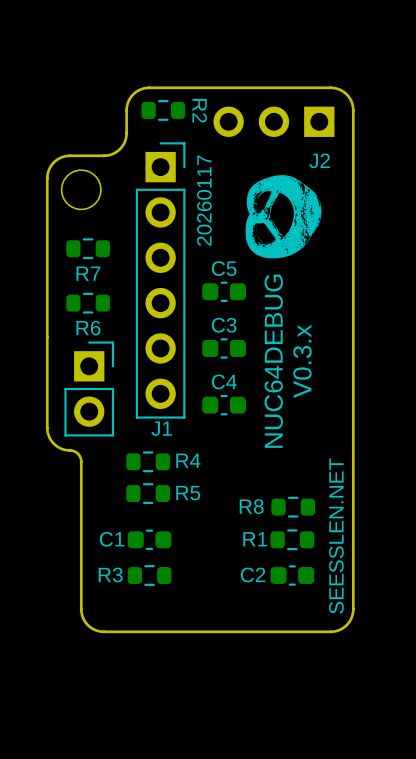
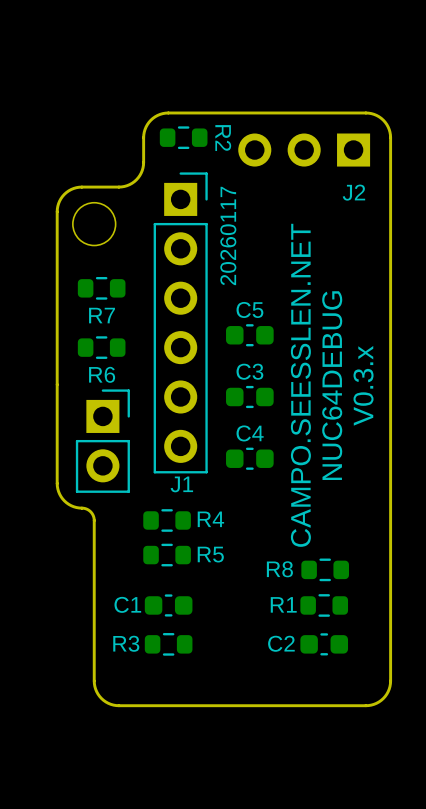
drawing: [245, 175, 322, 259] -> none
text: none -> CAMPO.SEESSLEN.NET (300, 385)
text position: NUC64DEBUG (273, 361) -> NUC64DEBUG (332, 385)
text position: V0.3.x (302, 361) -> V0.3.x (363, 385)
text: SEESSLEN.NET (336, 536) -> none

